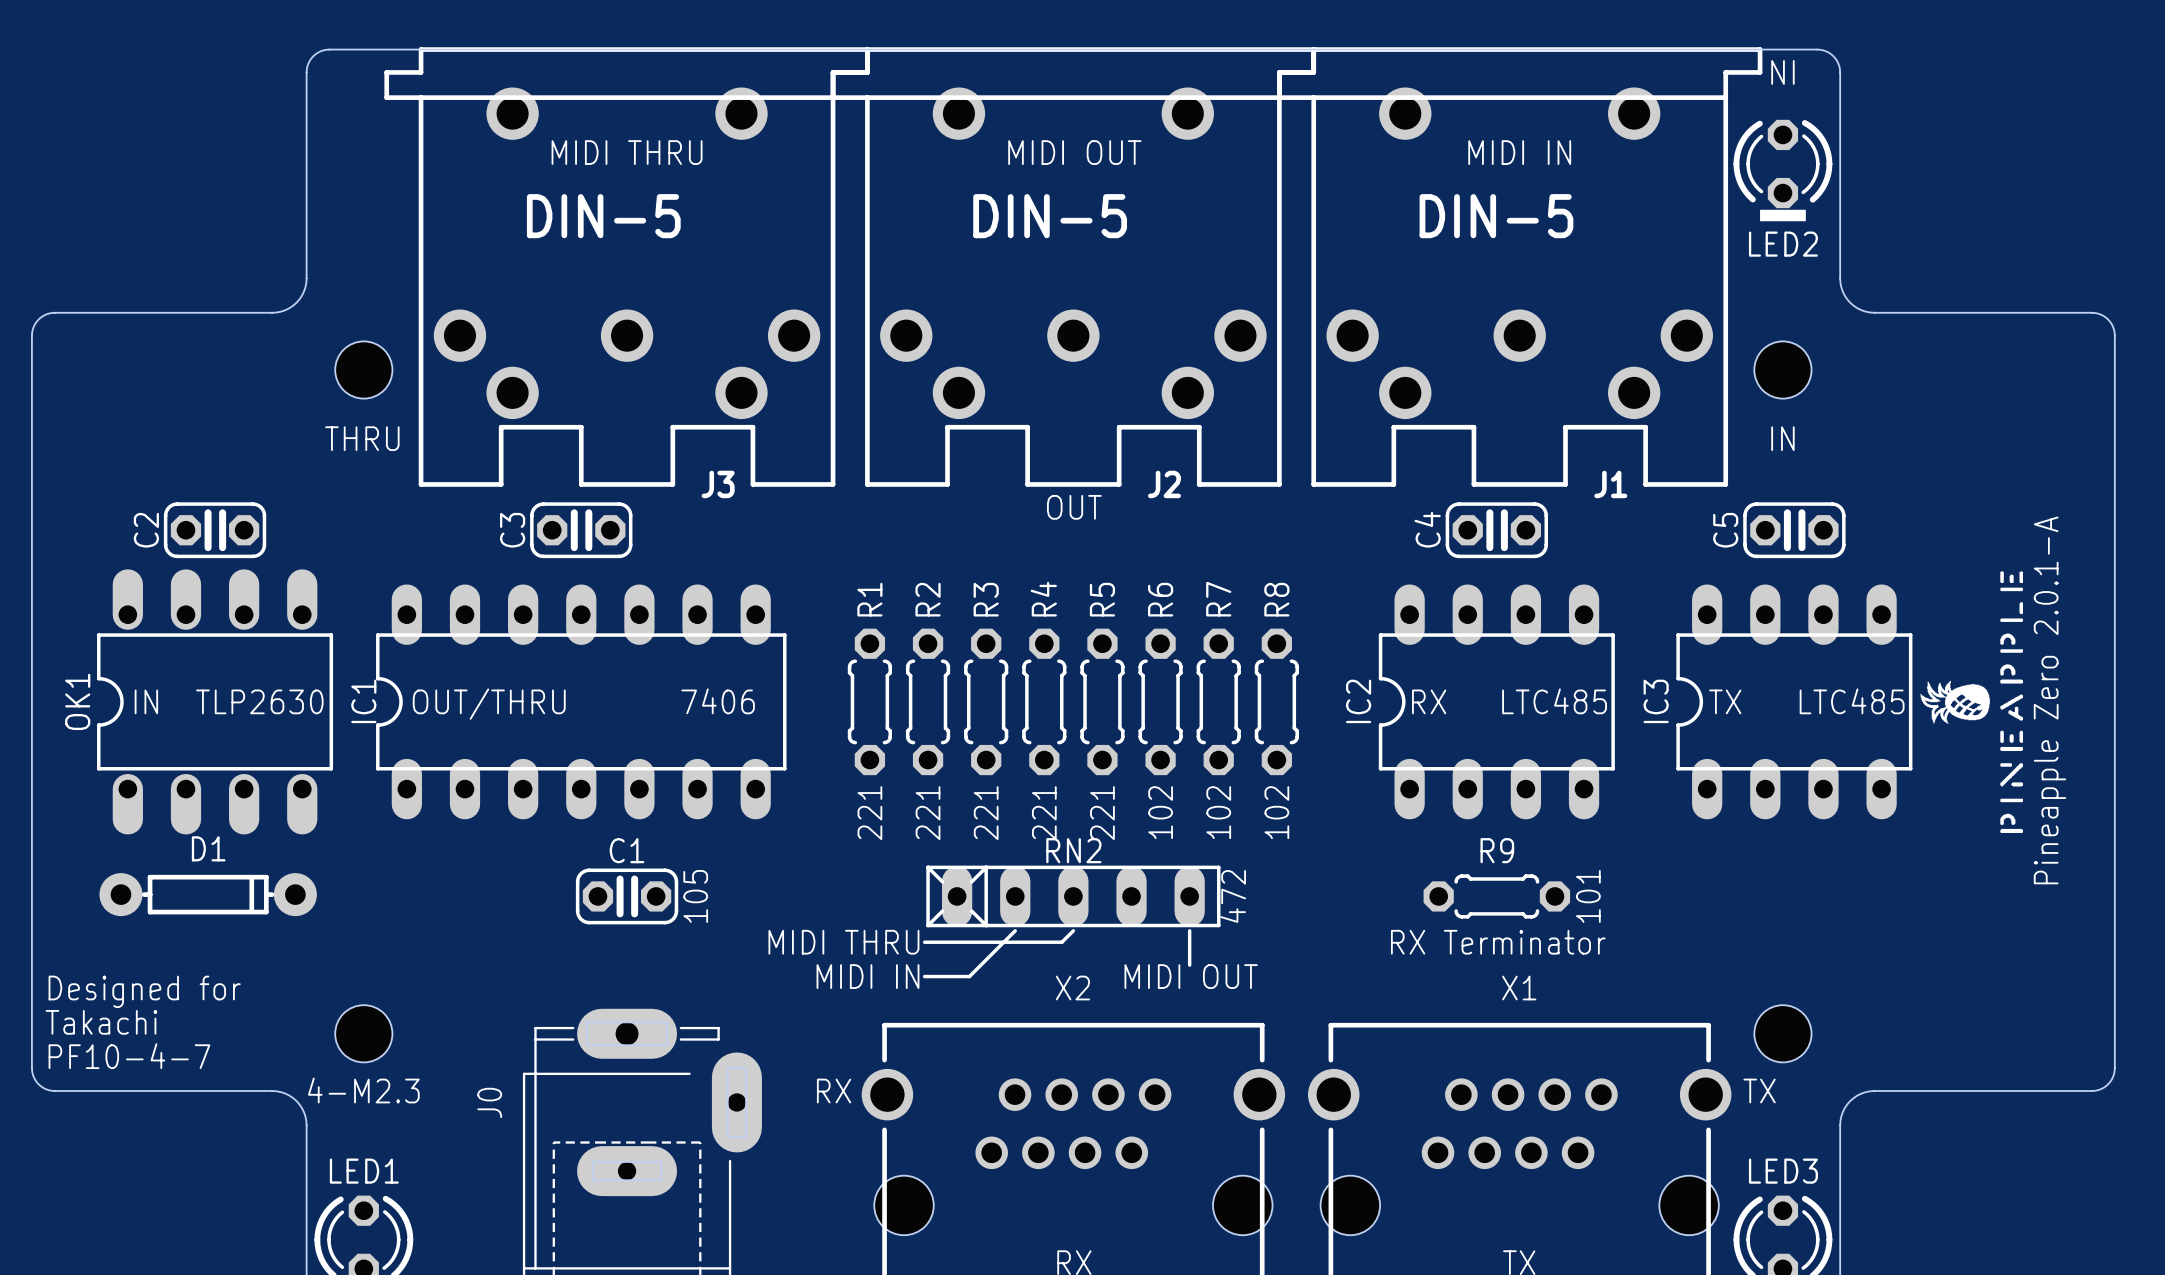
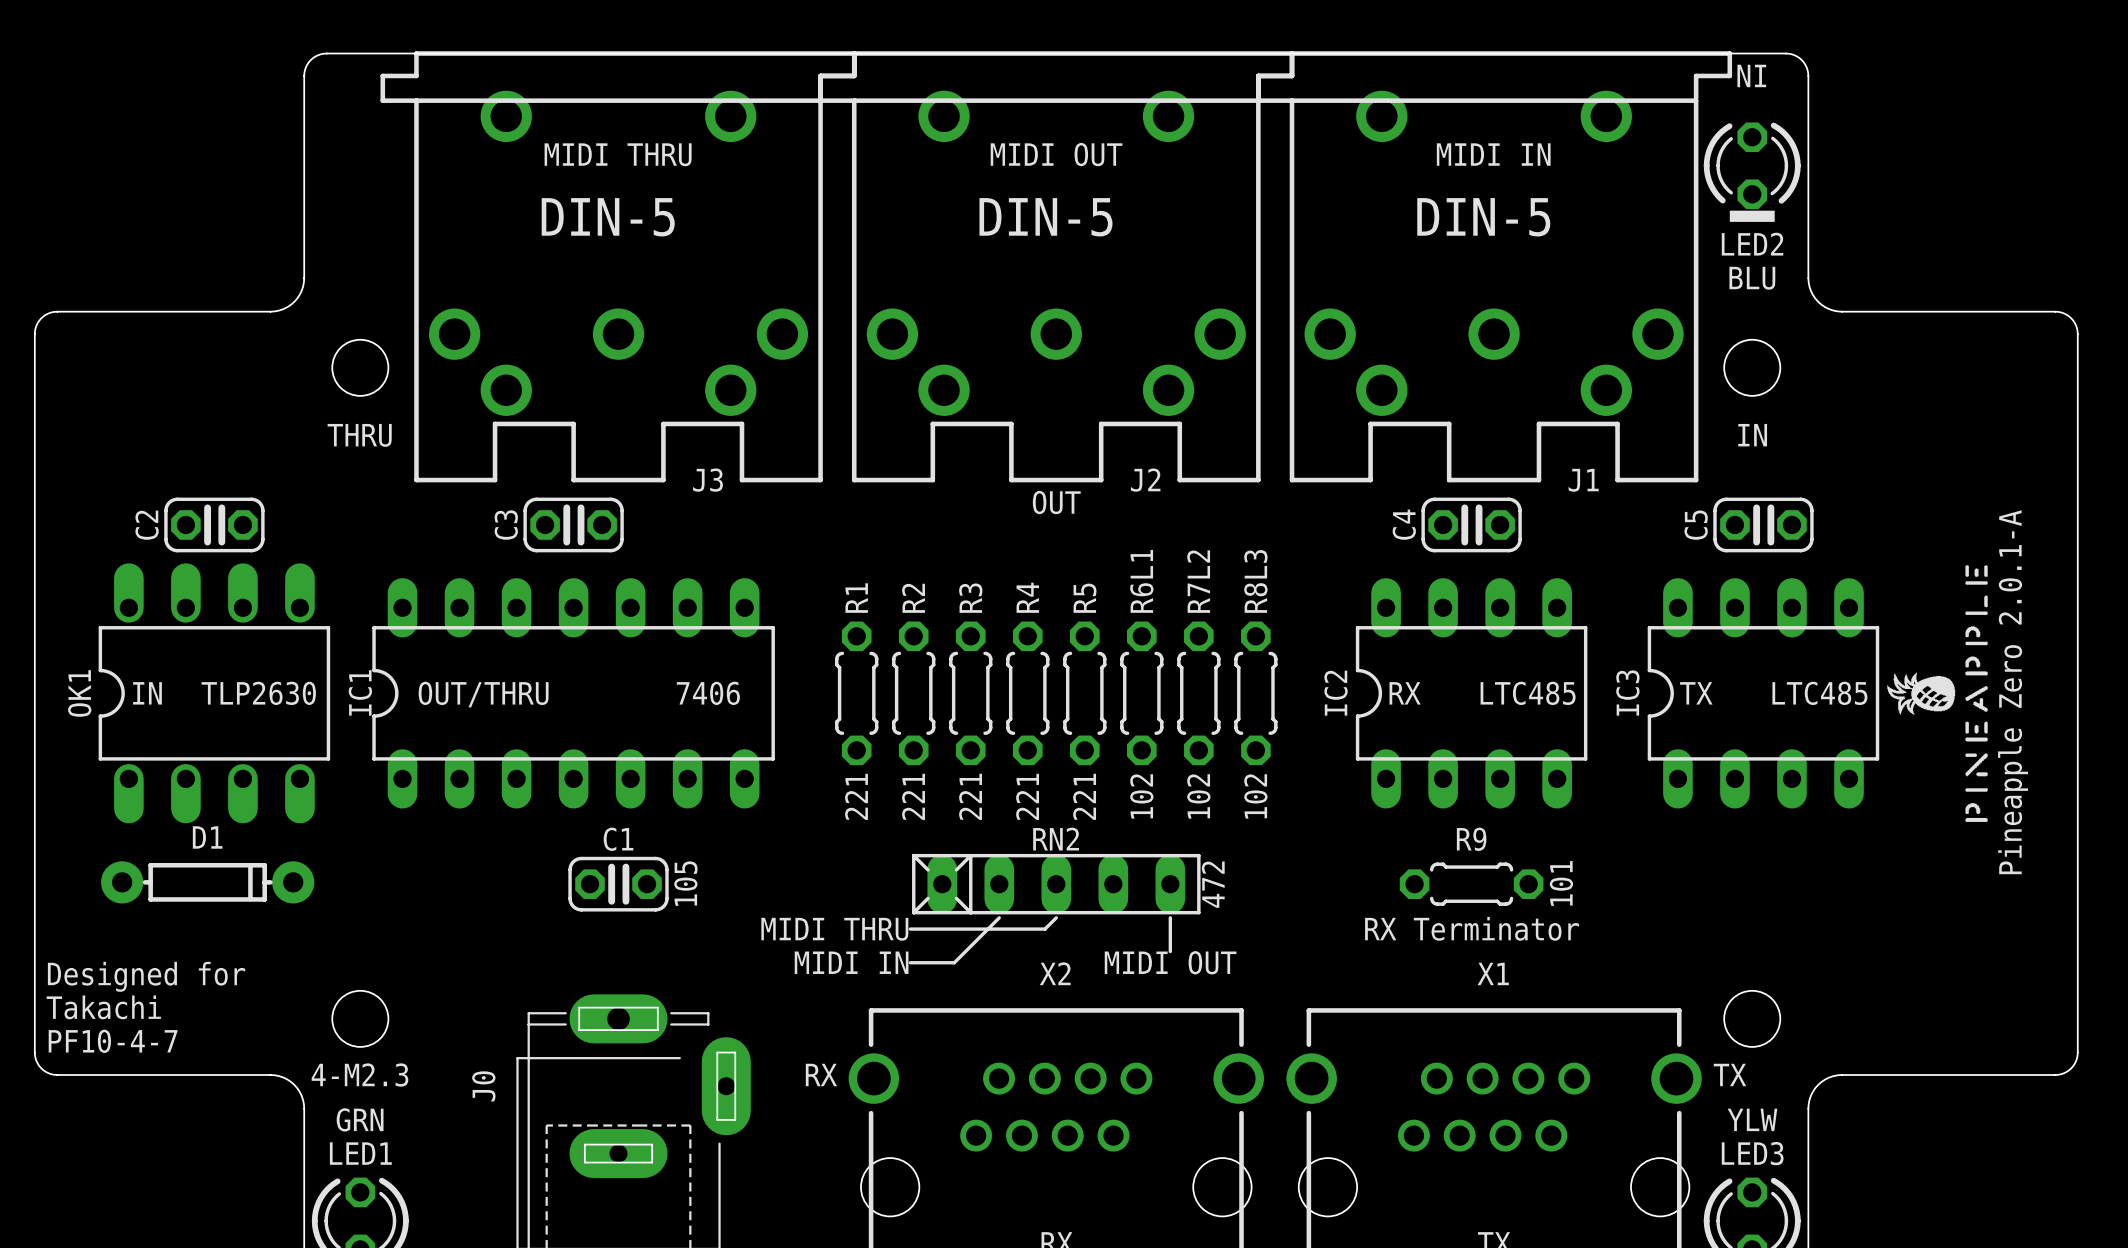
text: none -> BLU (1752, 278)
R6 name: R6 (1160, 599) -> R6L1 (1141, 581)
R7 name: R7 (1218, 599) -> R7L2 (1198, 581)
R8 name: R8 (1276, 599) -> R8L3 (1255, 581)
text: none -> GRN (360, 1119)
text: none -> YLW (1752, 1119)

